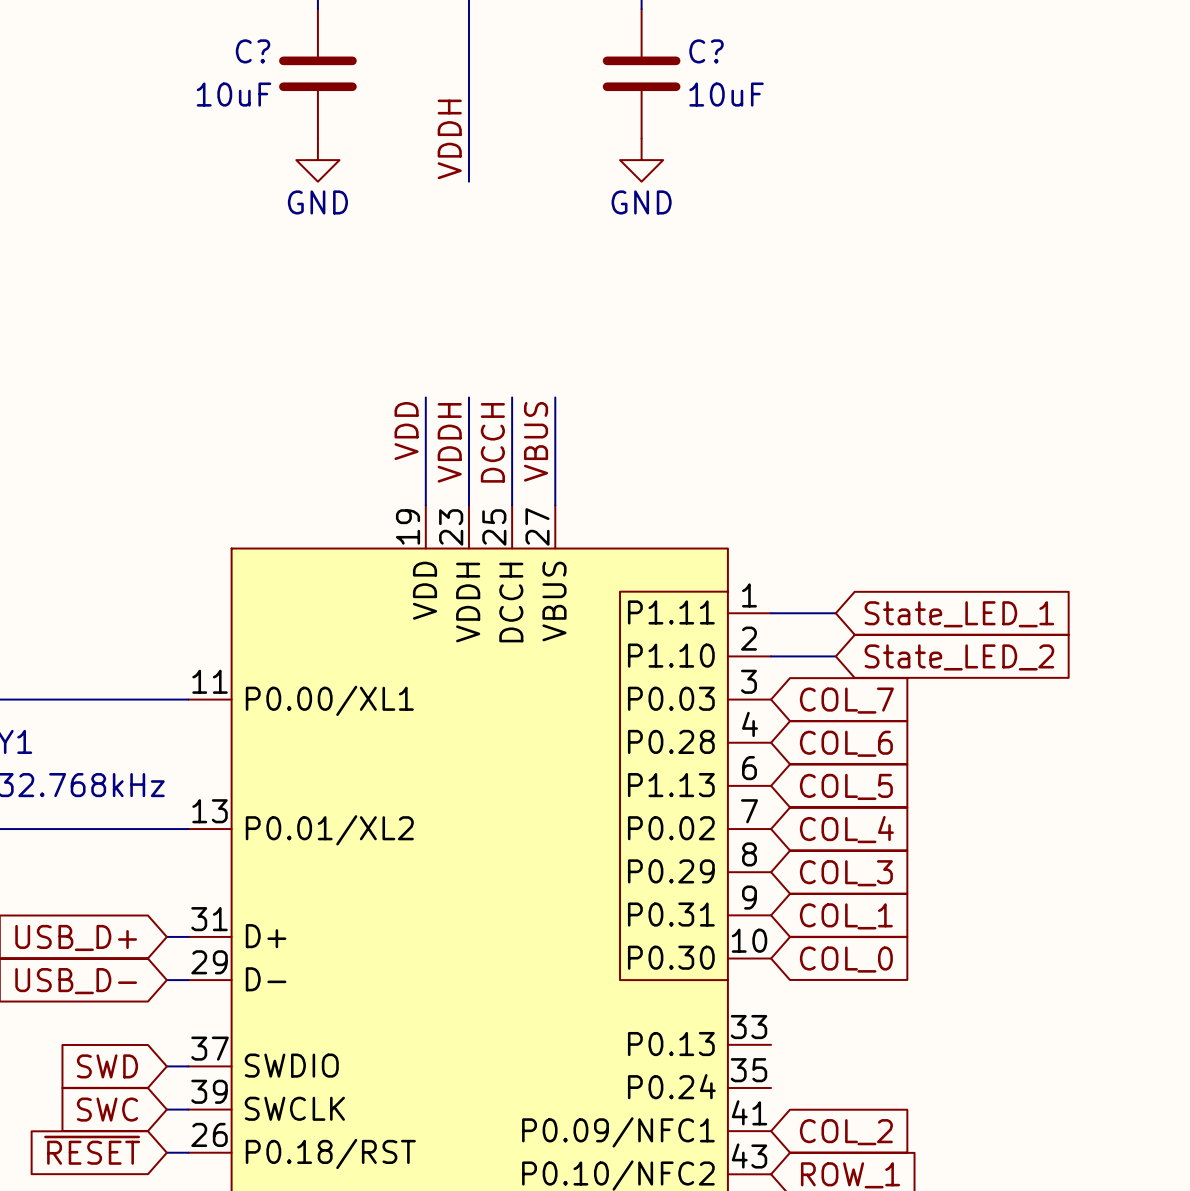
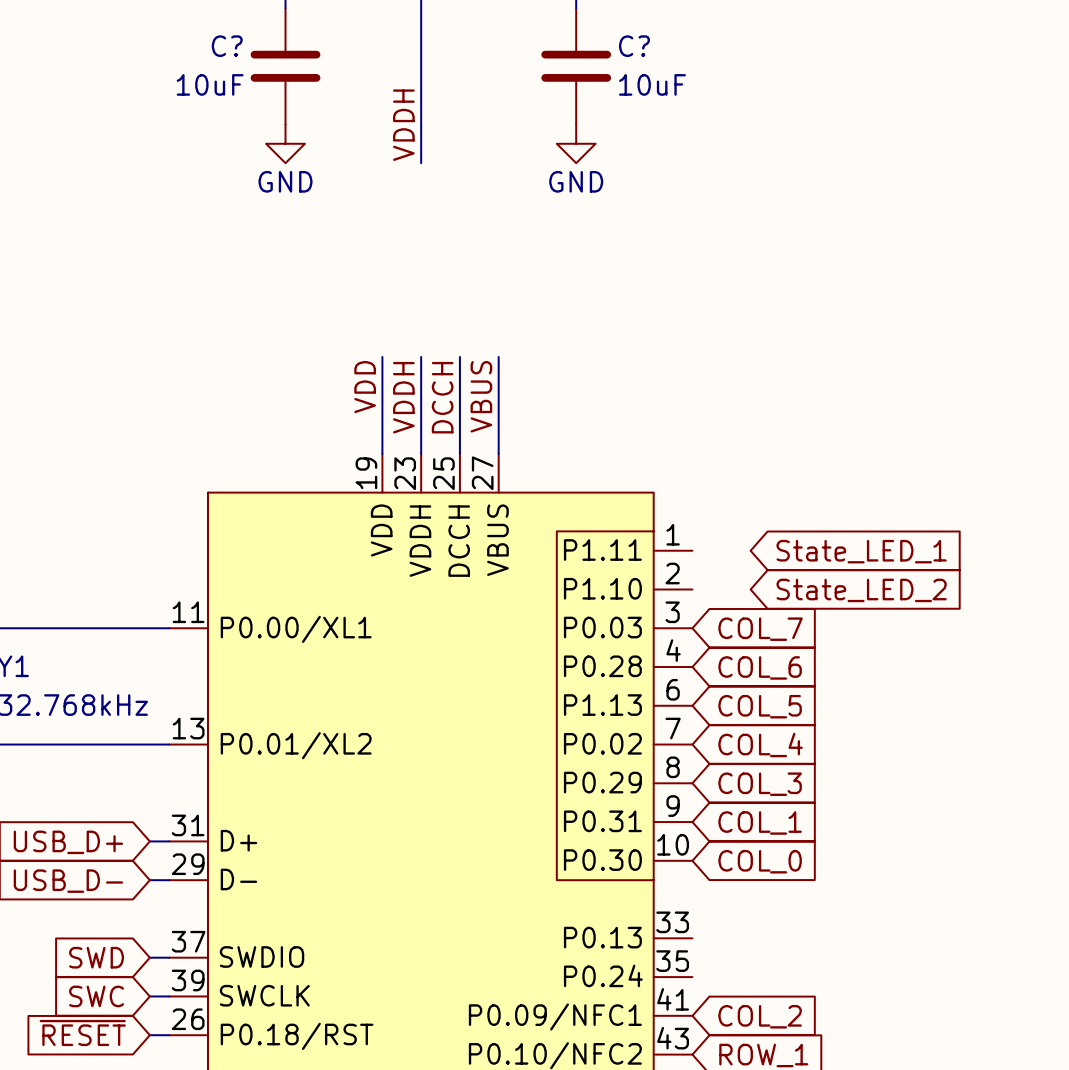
wire: (771, 613) (835, 613) -> none
wire: (771, 656) (835, 656) -> none

